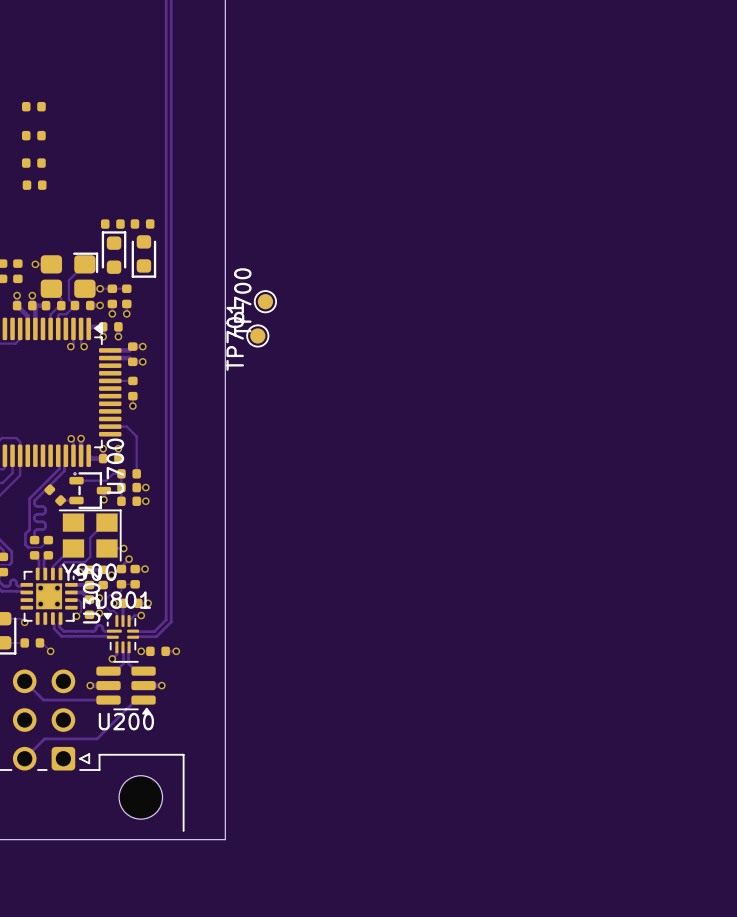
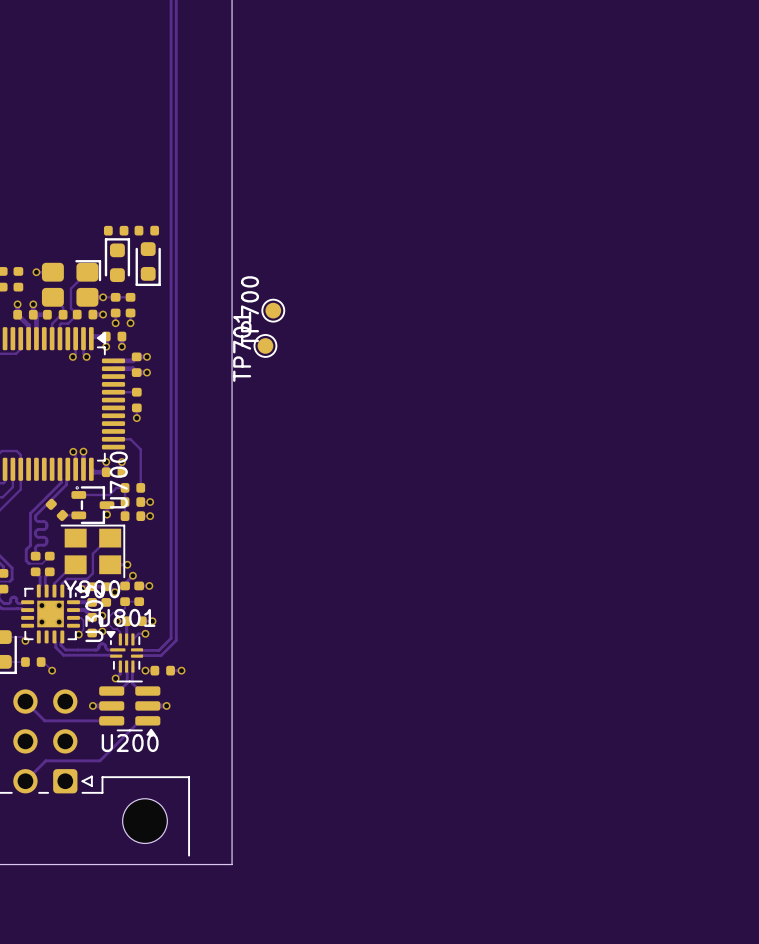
part: (33, 106) -> none
part: (33, 135) -> none
part: (33, 163) -> none
part: (34, 185) -> none

